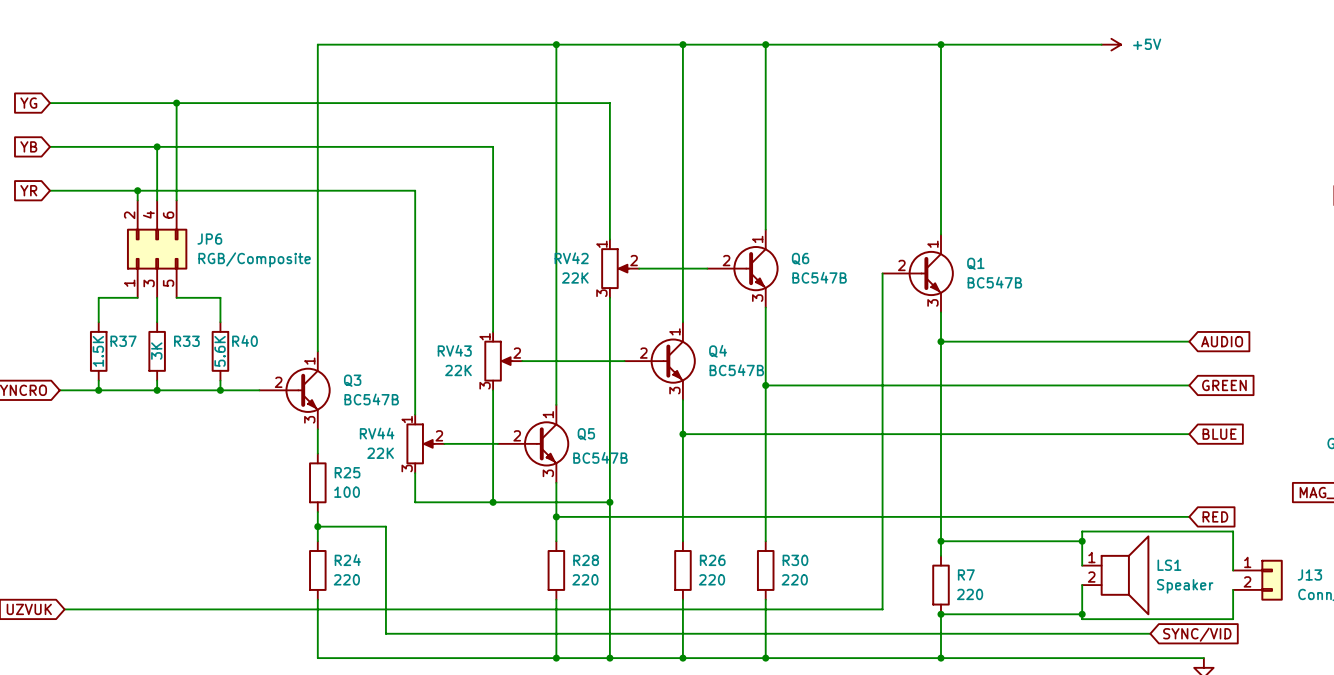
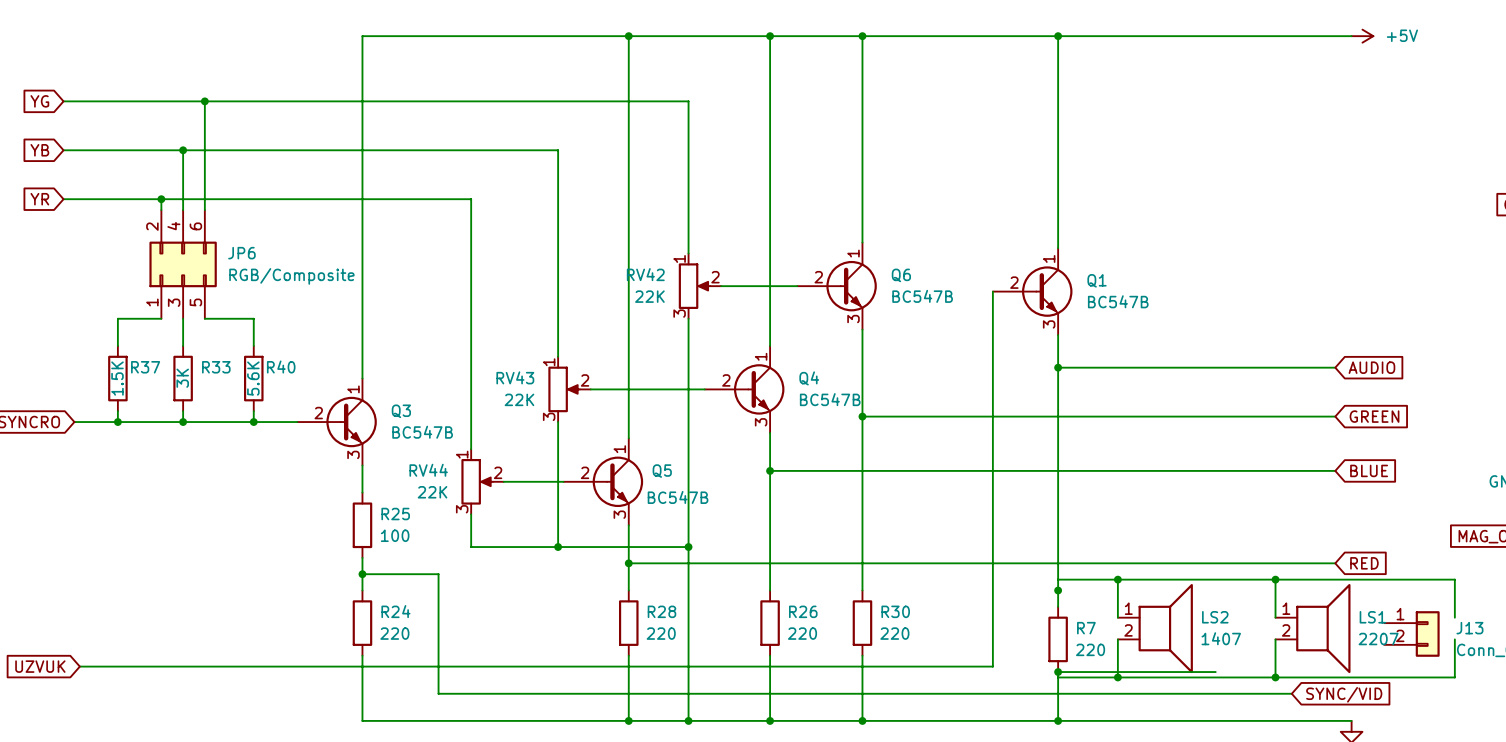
wire: none -> (1237, 36) (1351, 36)
power symbol position: +5V (1111, 44) -> +5V (1362, 36)
wire: none -> (1117, 579) (1117, 617)
junction: none -> (1117, 579)
wire: (1082, 531) (1082, 565) -> (1215, 579) (1058, 579)
wire: none -> (1275, 579) (1275, 617)
junction: none -> (1275, 579)
wire: (1233, 531) (1233, 570) -> (1384, 579) (1454, 579) (1454, 617)
wire: (940, 541) (1082, 541) -> none
junction: (1082, 541) -> none
LS2: none -> 1407 (1155, 628)
LS1 position: (1115, 575) -> (1313, 628)
wire: none -> (1117, 639) (1117, 677)
wire: (1082, 585) (1082, 619) -> (1058, 677) (1215, 677)
wire: none -> (1275, 639) (1275, 677)
LS1 value: Speaker (1185, 586) -> 2207 (1378, 639)
wire: (1233, 589) (1233, 619) -> (1454, 639) (1454, 677) (1384, 677)
junction: (1082, 614) -> none
junction: none -> (1117, 677)
junction: none -> (1275, 677)

